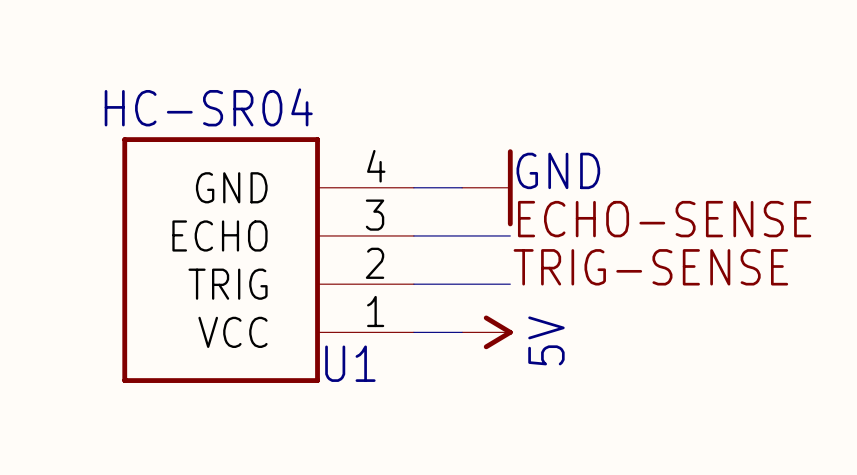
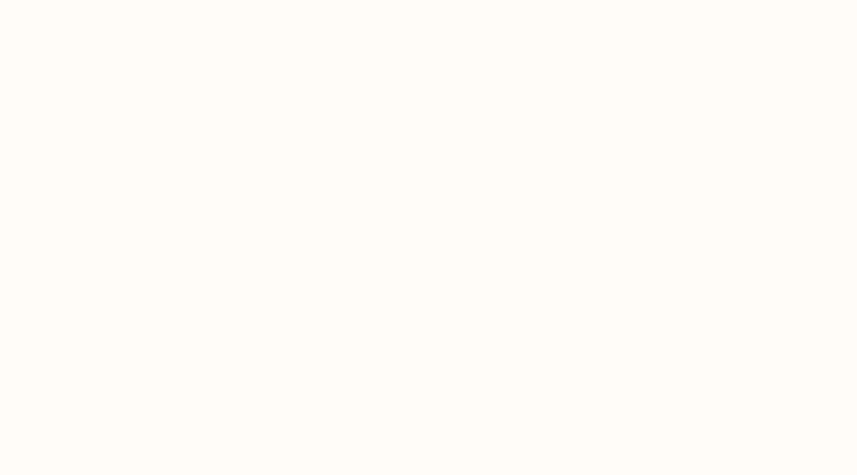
wire: (413, 187) (462, 187) -> none
power symbol: GND (487, 187) -> none
label: ECHO-SENSE (664, 219) -> none
wire: (413, 235) (510, 235) -> none
U1: HC-SR04 (268, 260) -> none
label: TRIG-SENSE (650, 267) -> none
wire: (413, 284) (510, 284) -> none
wire: (413, 332) (462, 332) -> none
power symbol: 5V (487, 332) -> none

